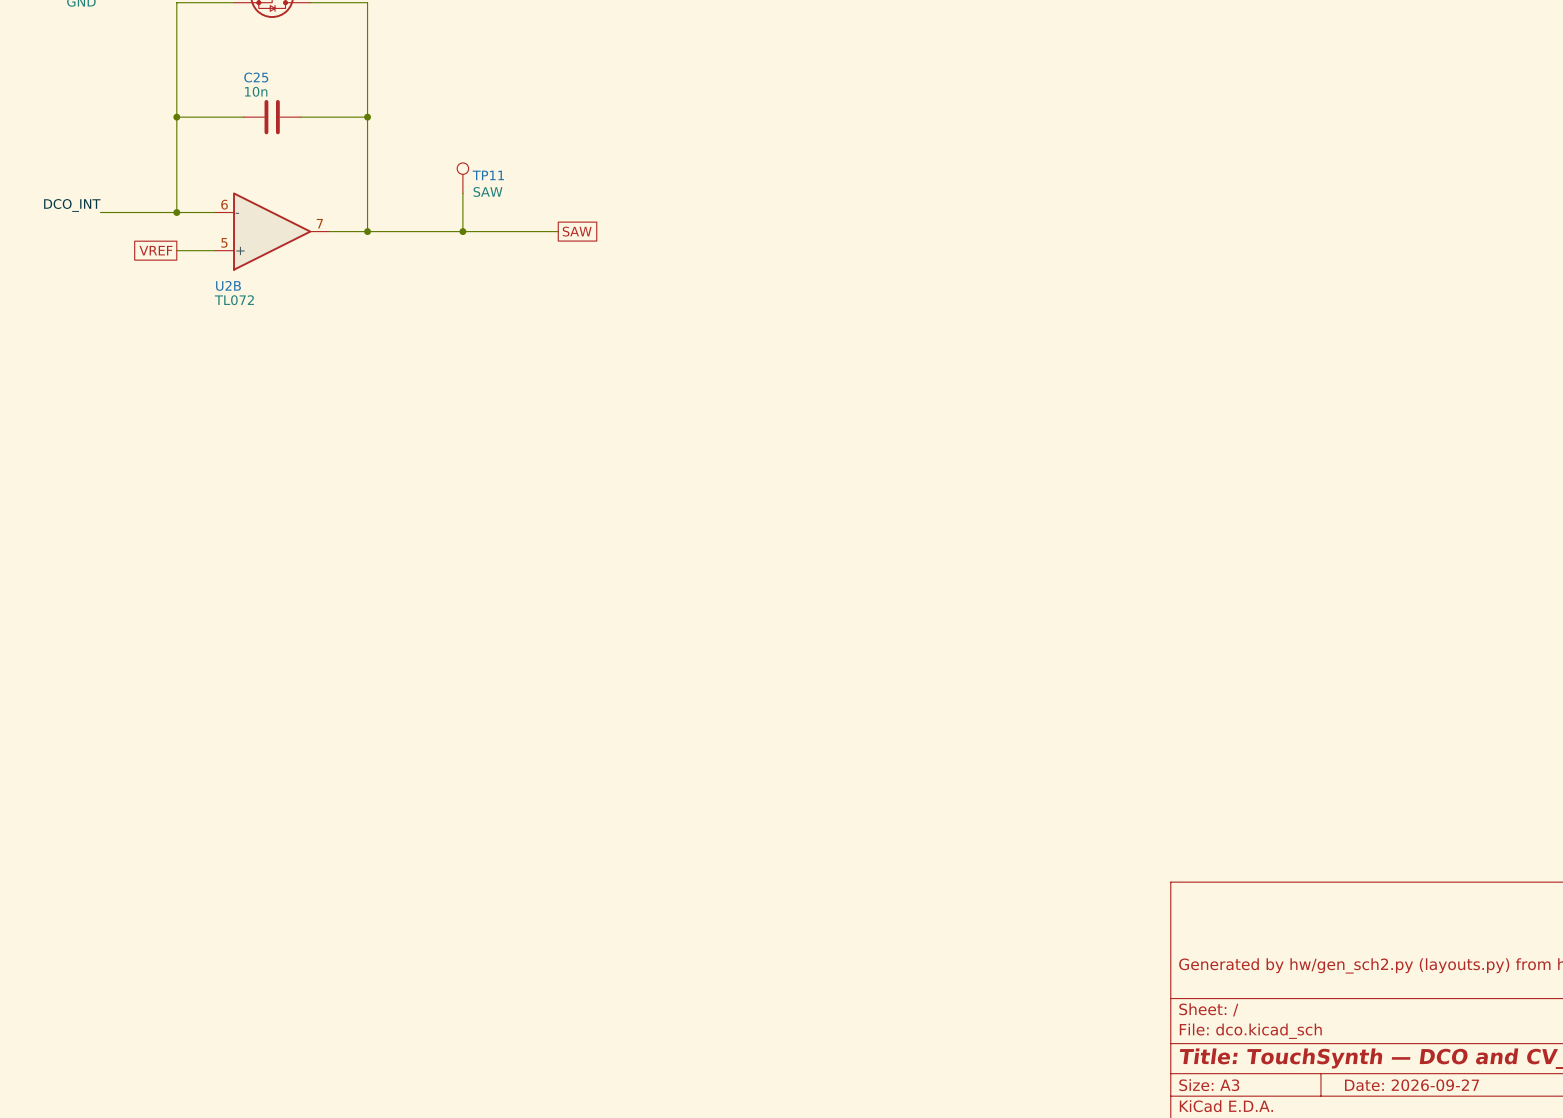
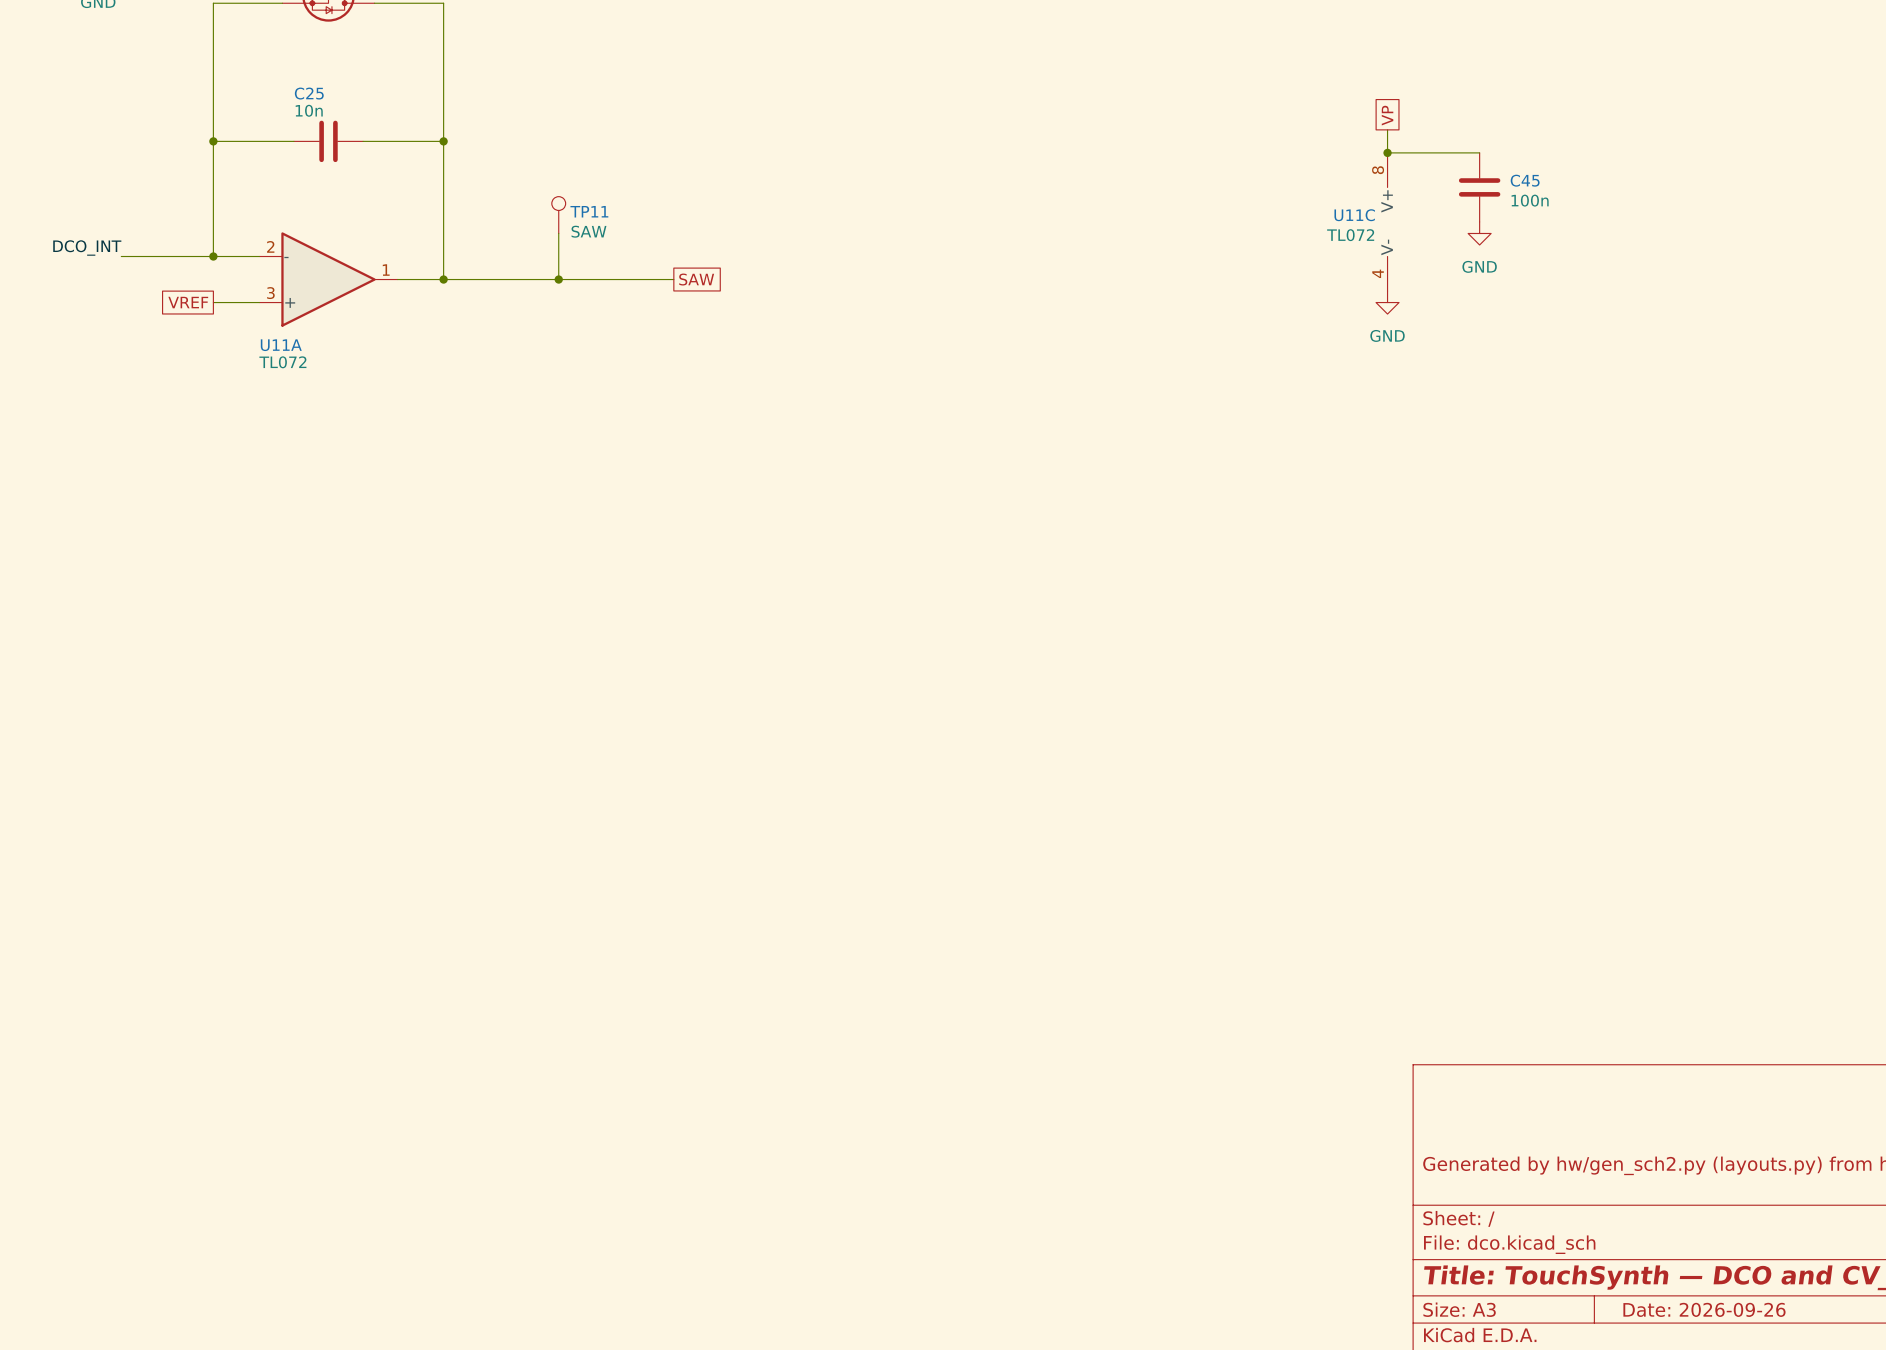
global label: none -> VP (1387, 115)
wire: none -> (1387, 129) (1387, 152) (1479, 152)
junction: none -> (1387, 152)
C45: none -> 100n (1479, 187)
U11C: none -> TL072 (1387, 221)
power symbol: none -> GND (1479, 233)
U2B pin number: 6 (224, 204) -> 2 (270, 246)
U2B pin number: 7 (319, 223) -> 1 (386, 270)
U2B pin number: 5 (224, 242) -> 3 (270, 293)
power symbol: none -> GND (1387, 302)
U2B name: U2B (228, 285) -> U11A (281, 345)
title block: Date: 2026-09-27 (1412, 1085) -> Date: 2026-09-26 (1704, 1309)

